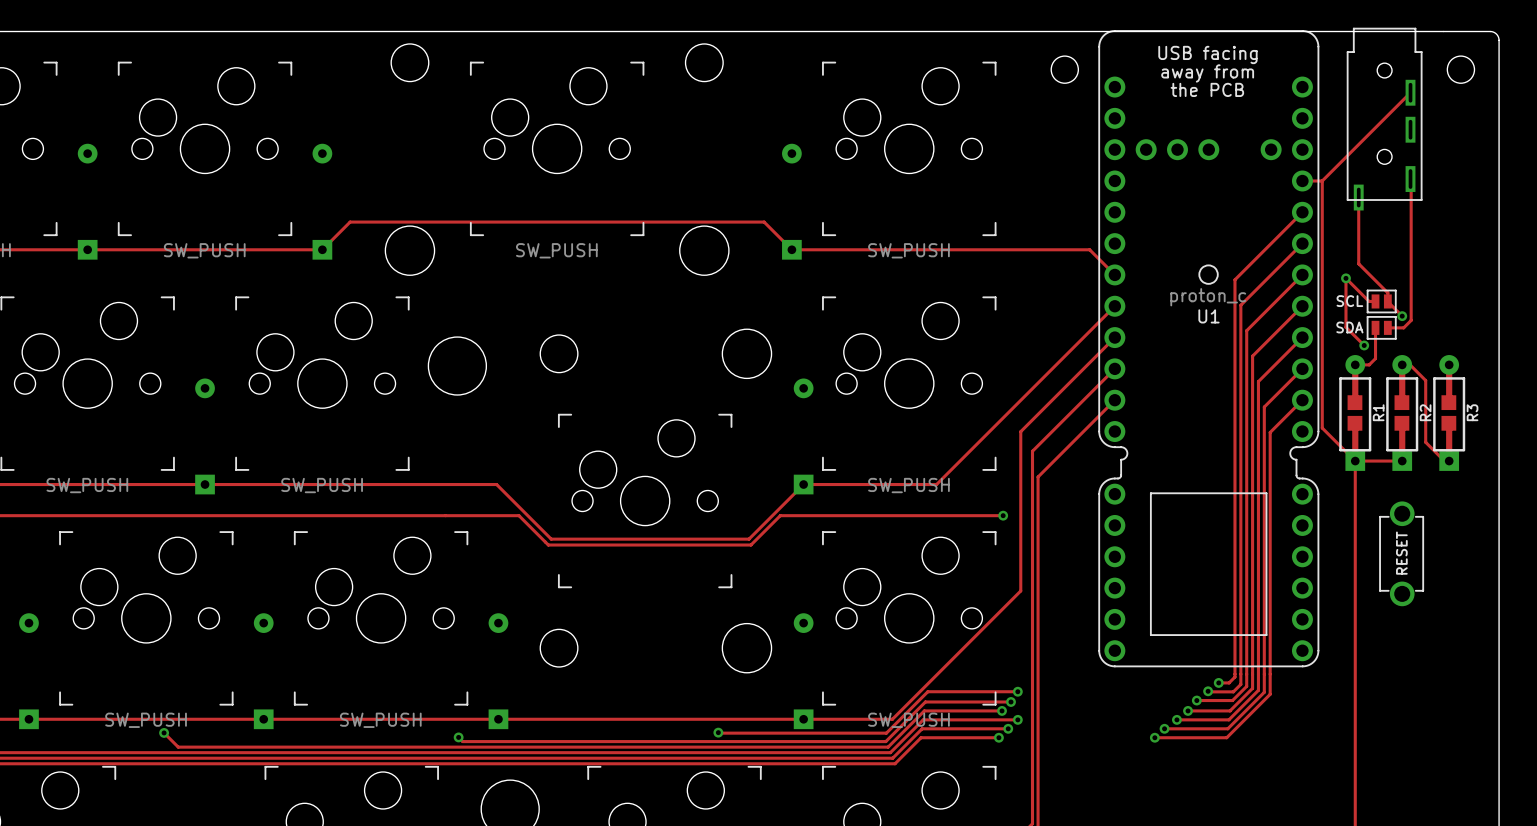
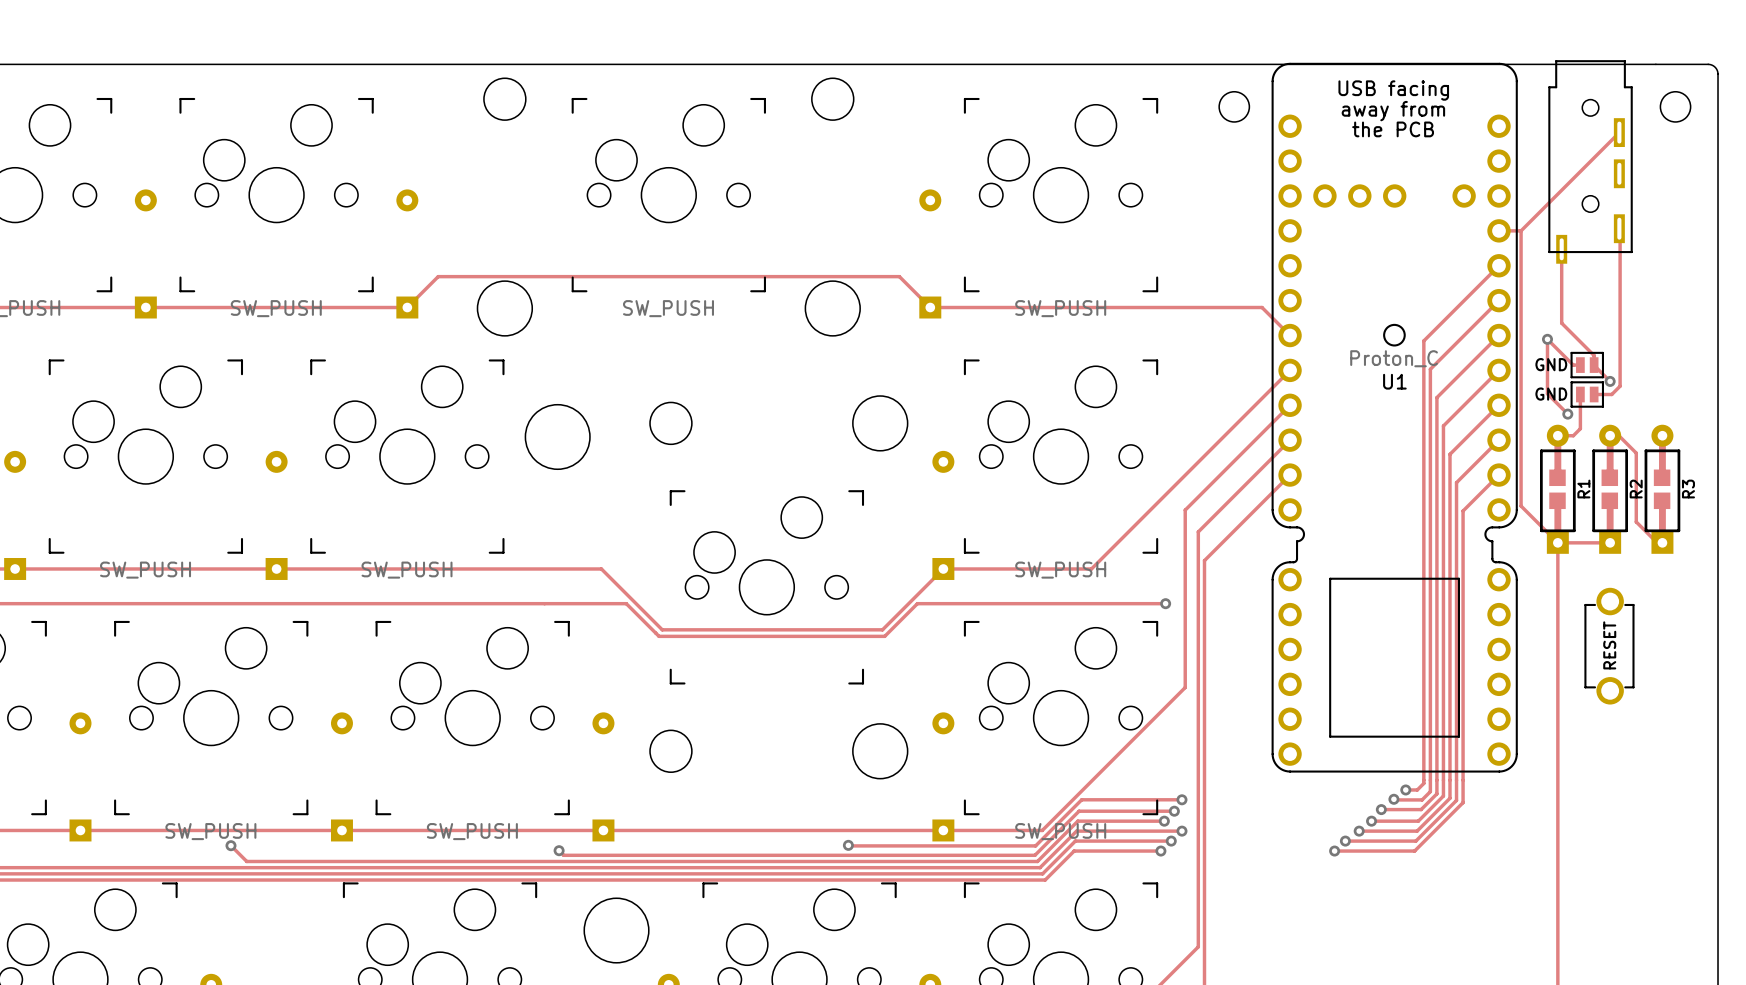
U1 value: proton_c (1208, 297) -> Proton_C (1394, 358)
part value: SCL (1349, 301) -> GND (1551, 364)
part value: SDA (1349, 327) -> GND (1551, 394)

